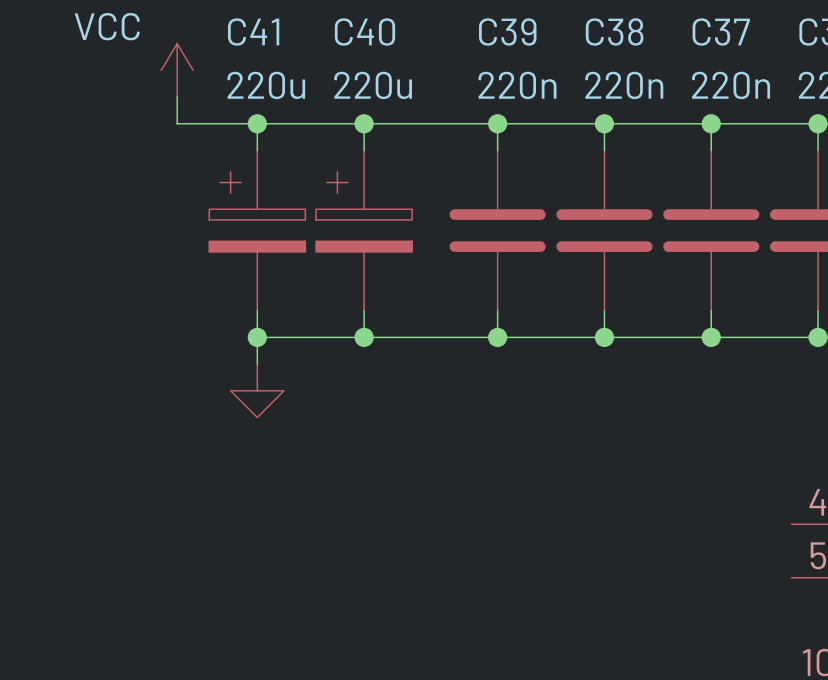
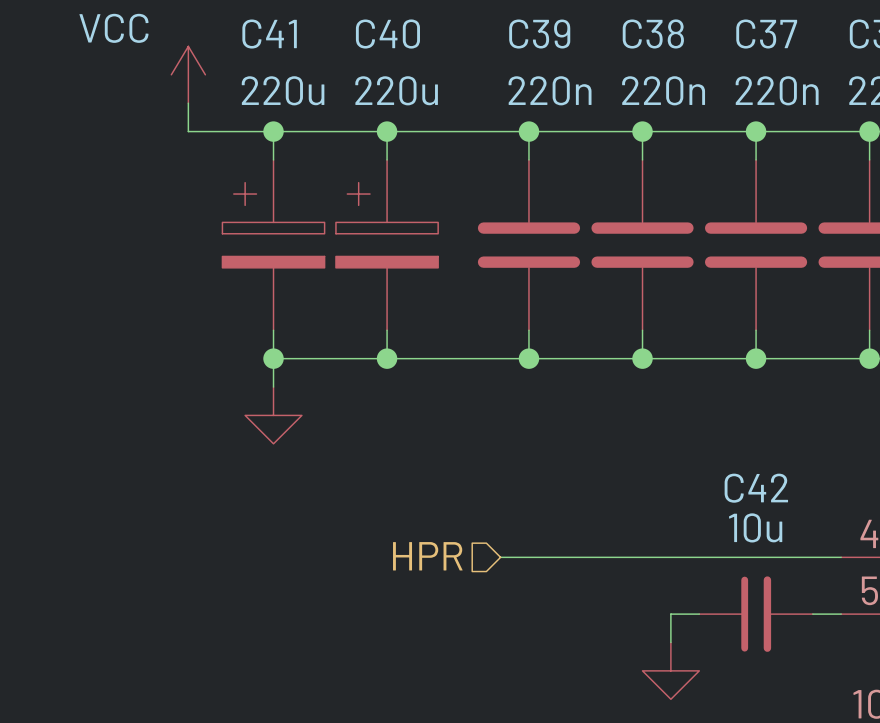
hierarchical label: none -> HPR (427, 556)
wire: none -> (500, 557) (841, 557)
wire: none -> (699, 614) (670, 614) (670, 642)
C42: none -> 10u (756, 614)
wire: none -> (812, 614) (841, 614)
power symbol: none -> (670, 670)

